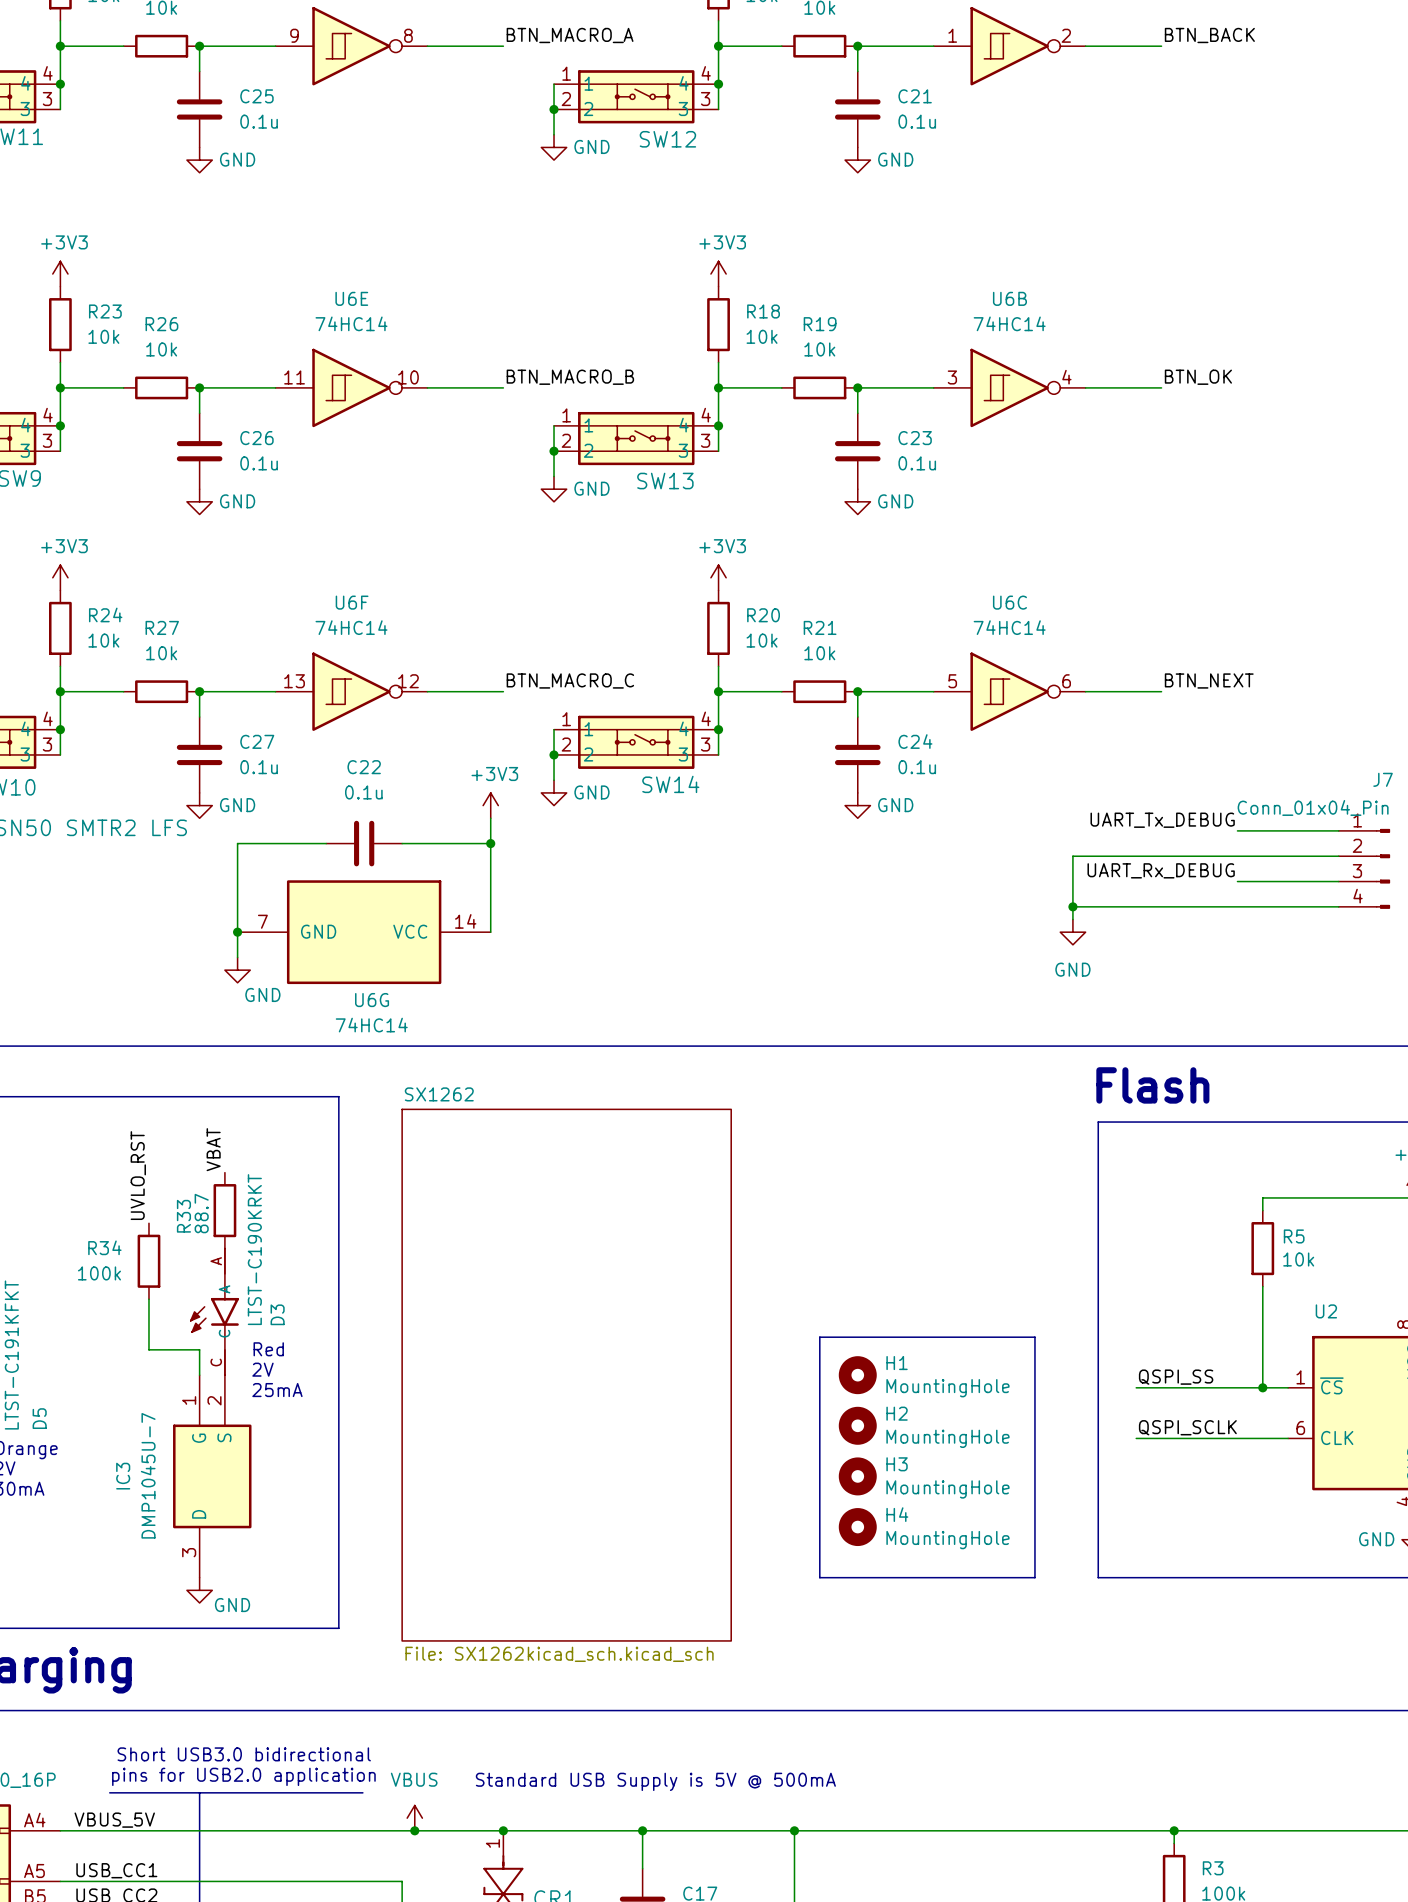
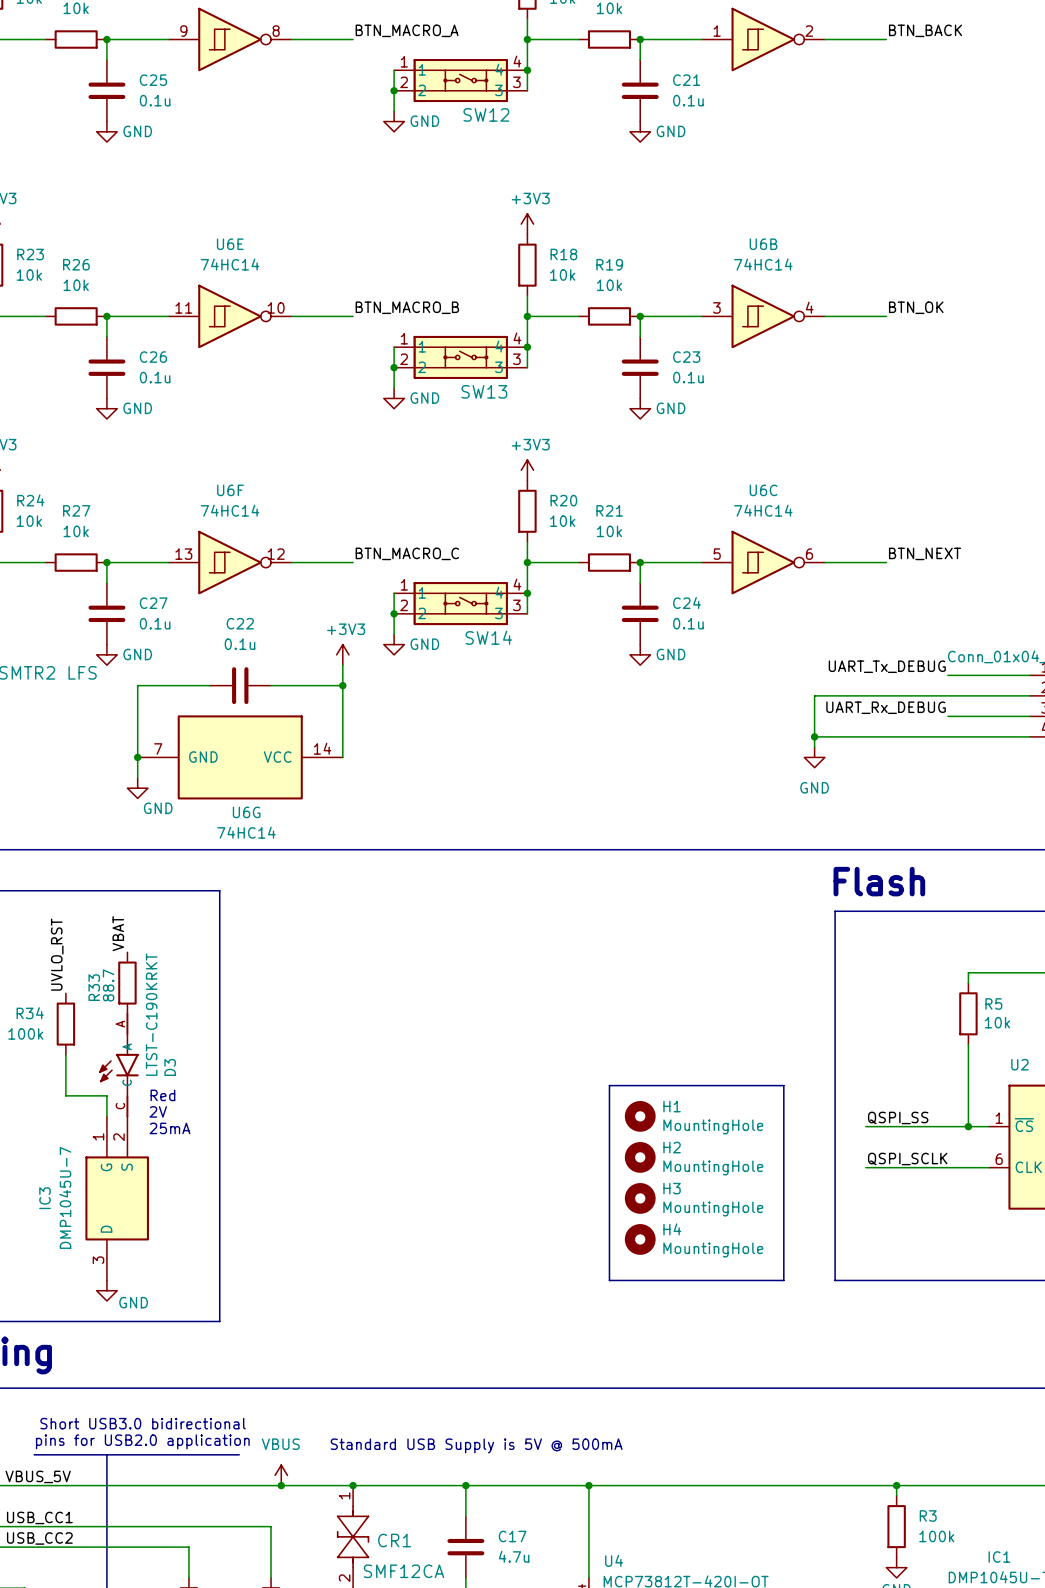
sheet SX1262: File: SX1262kicad_sch.kicad_sch (566, 1375) -> none

